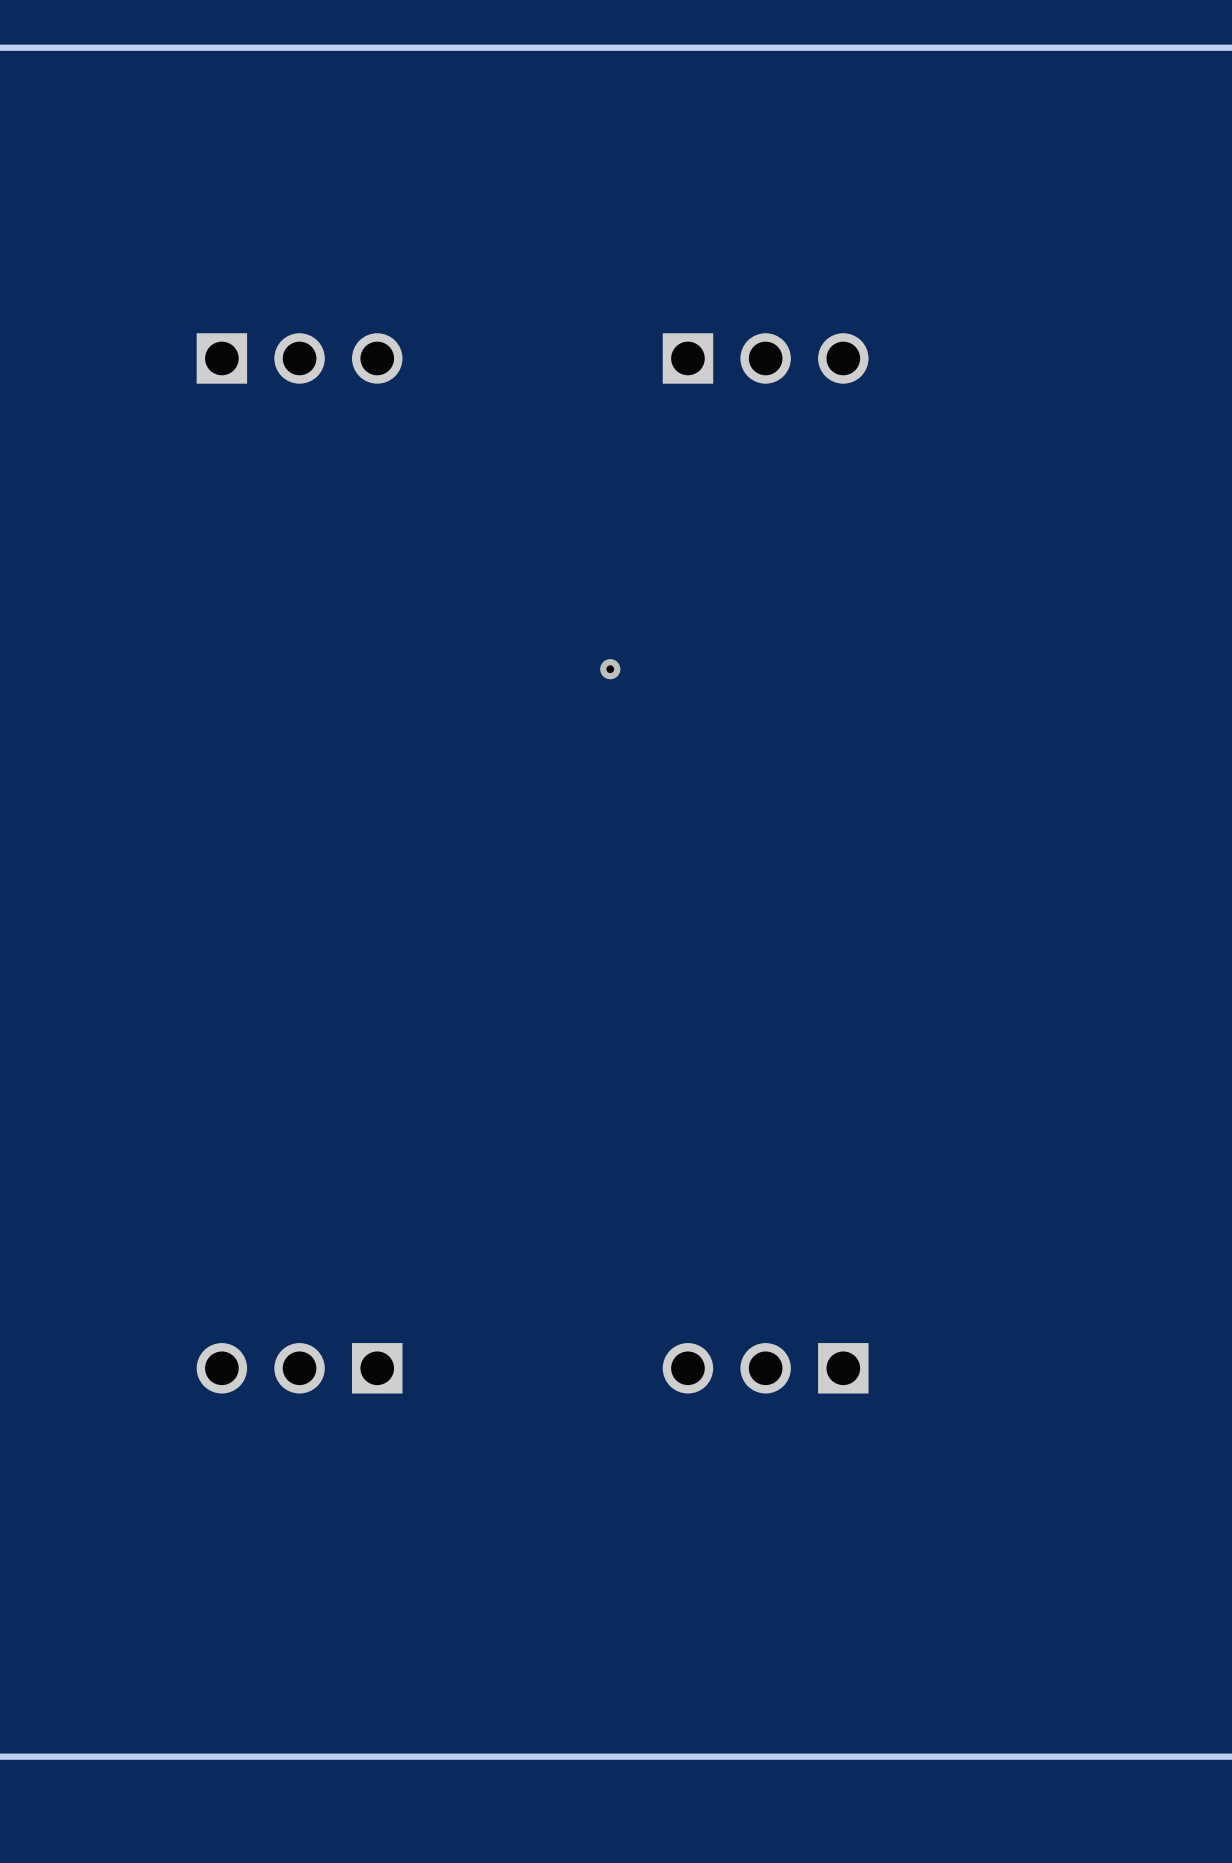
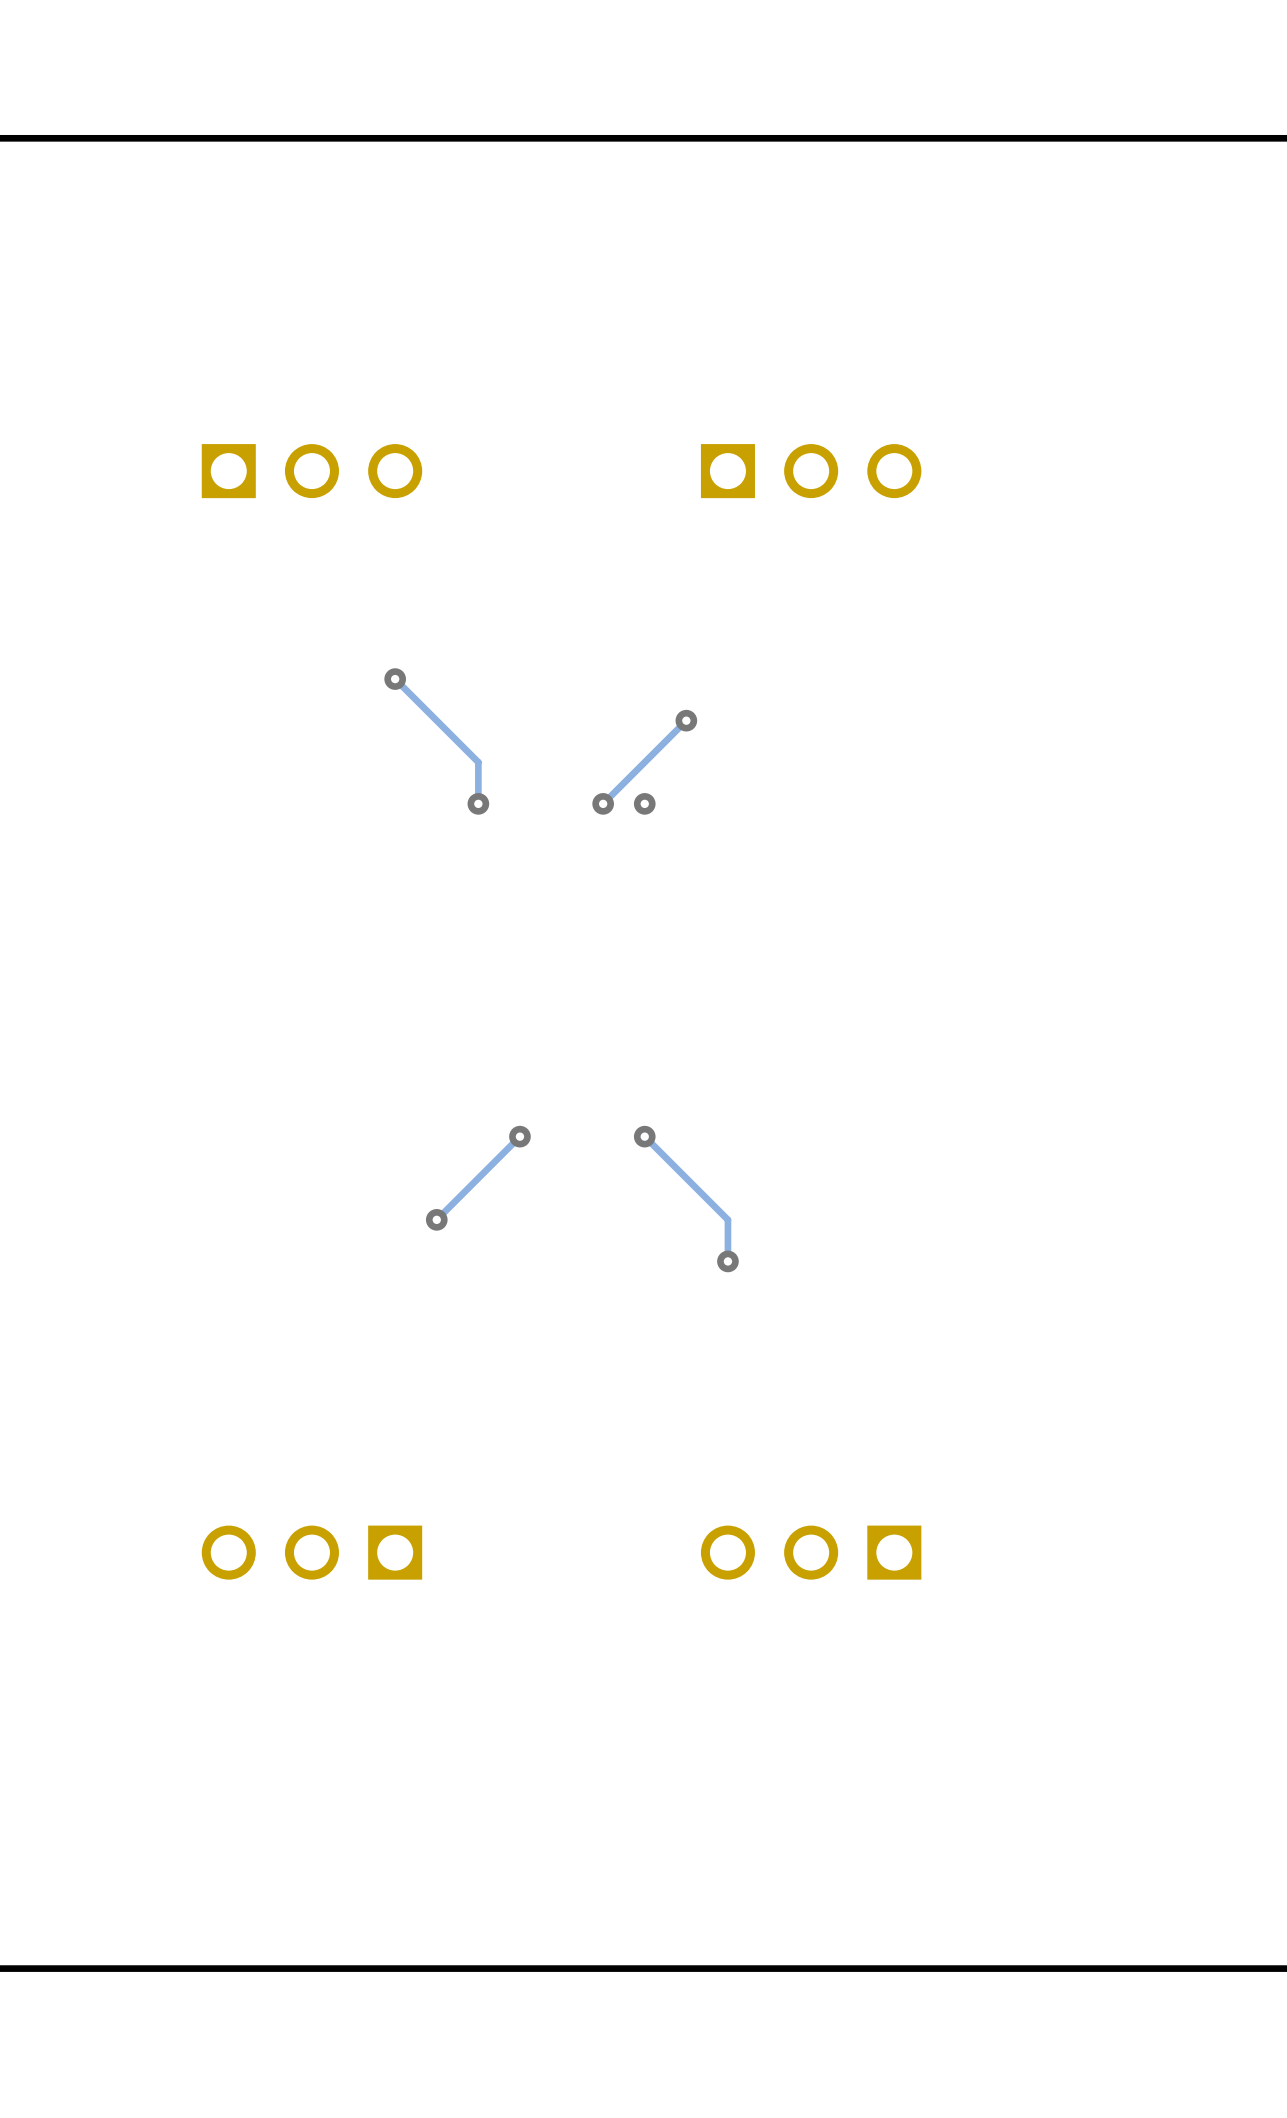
track: none -> (395, 679) (478, 762) (478, 803)
via: none -> (395, 679)
track: none -> (686, 720) (603, 803)
via: none -> (686, 720)
via: none -> (478, 803)
via: none -> (603, 803)
track: none -> (519, 1136) (436, 1219)
via: none -> (519, 1136)
track: none -> (644, 1136) (727, 1219) (727, 1261)
via: none -> (644, 1136)
via: none -> (436, 1219)
via: none -> (727, 1261)

